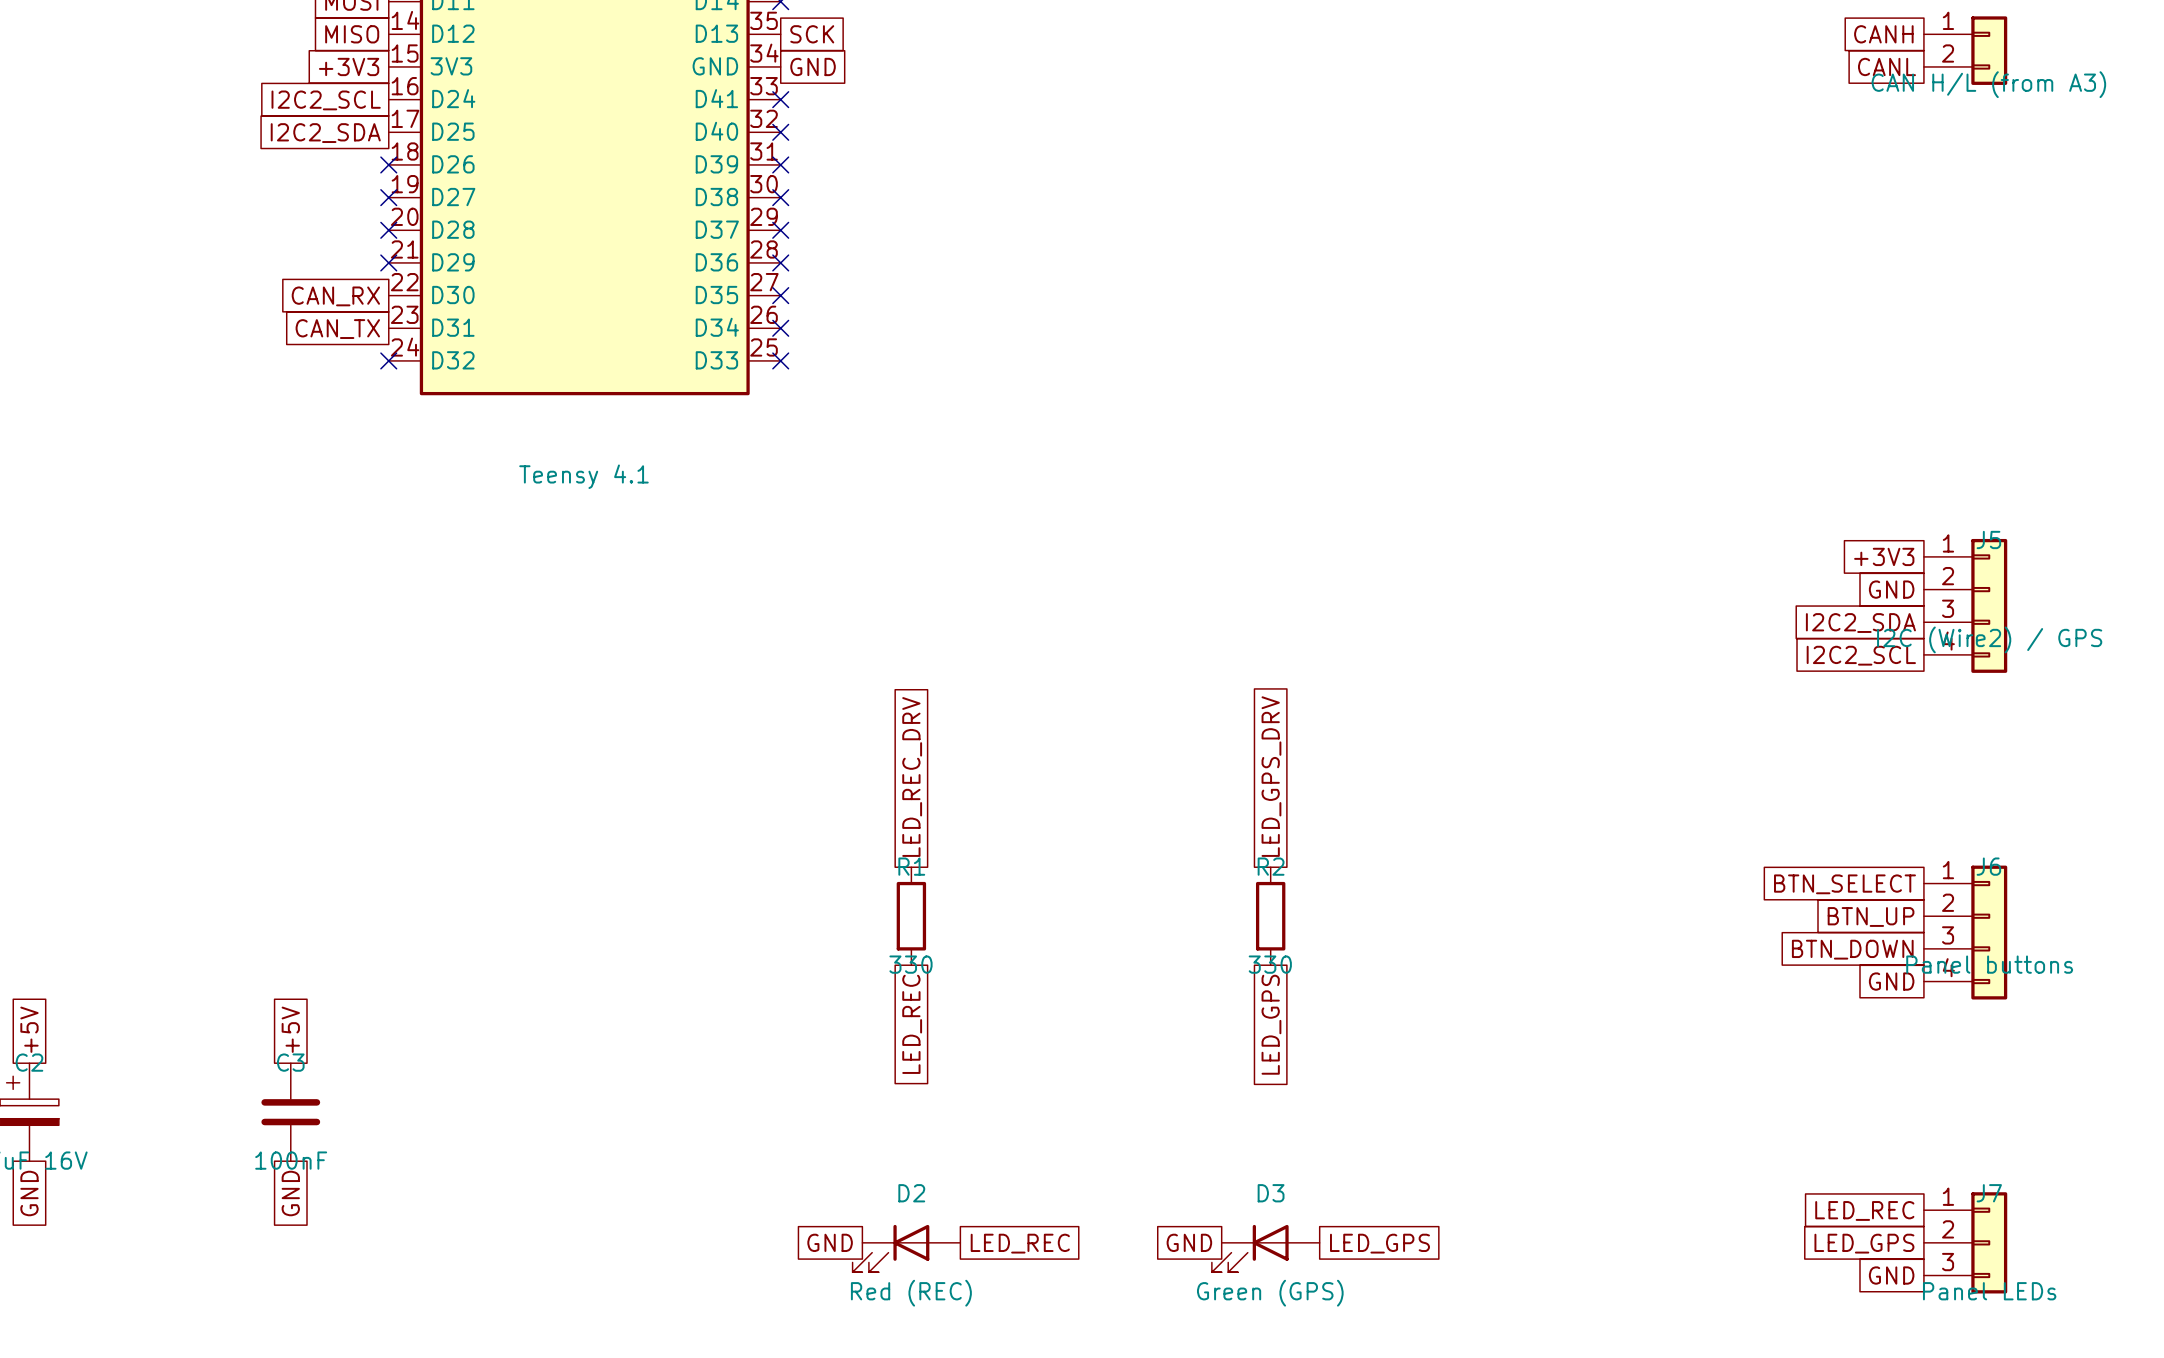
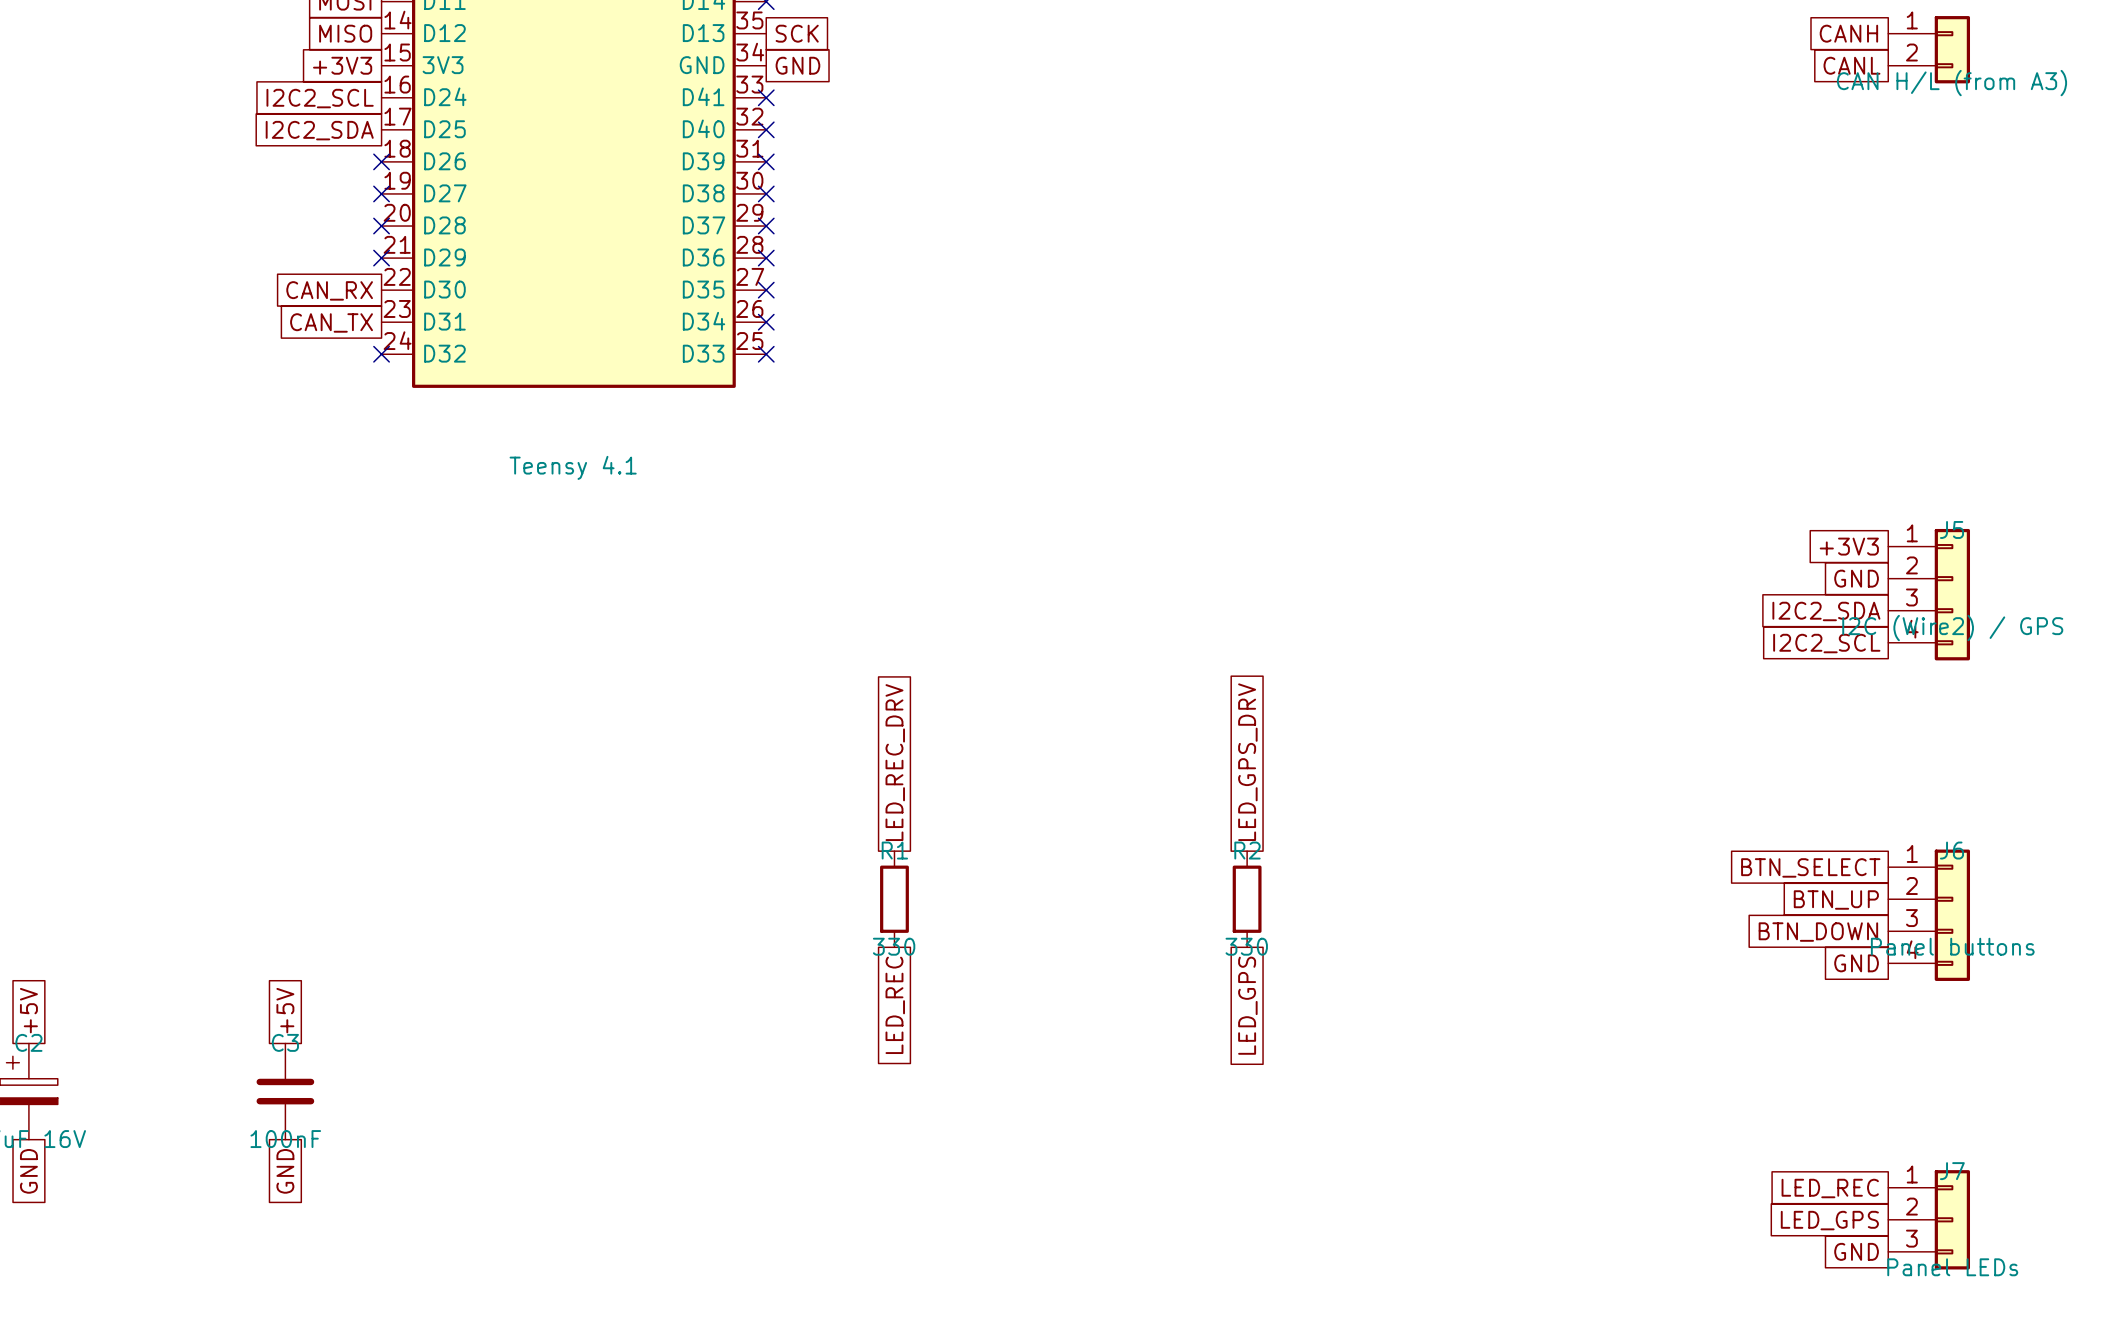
global label: GND (830, 1242) -> none
global label: GND (1189, 1242) -> none
global label: LED_REC (1020, 1243) -> none
global label: LED_GPS (1379, 1243) -> none
D2: Red (REC) (906, 1248) -> none
D3: Green (GPS) (1265, 1248) -> none

